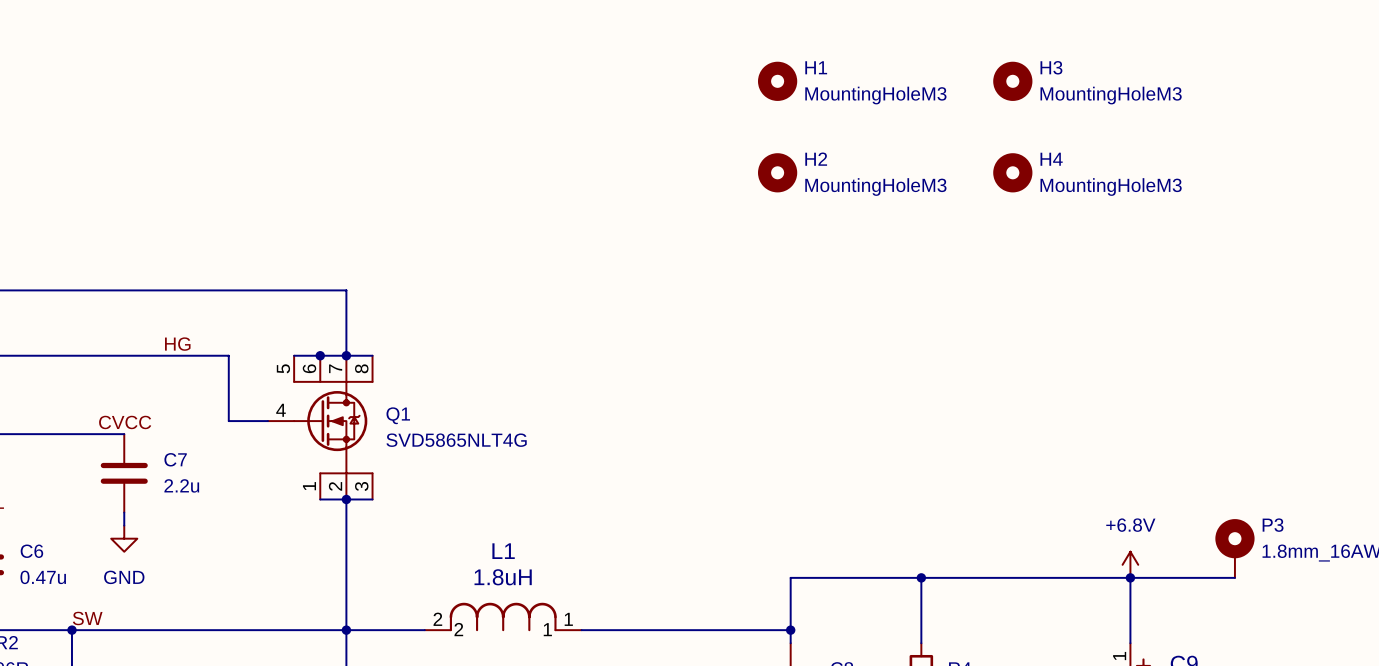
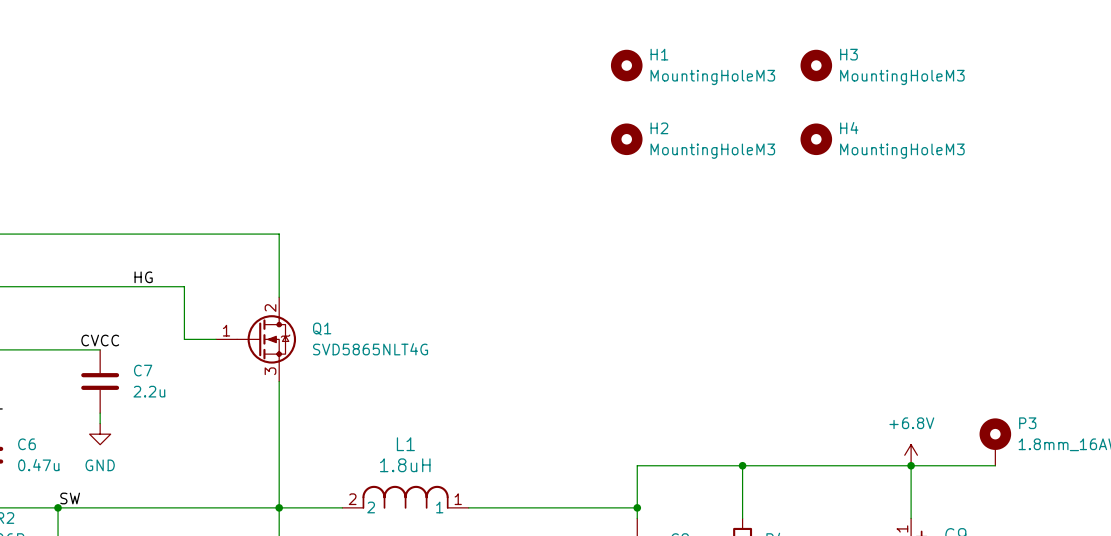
Q1 symbol: [267, 355, 373, 500] -> [216, 297, 297, 382]
wire: (294, 355) (372, 355) -> none
junction: (320, 355) -> none
junction: (346, 355) -> none
wire: (320, 499) (372, 499) -> none
junction: (346, 499) -> none

